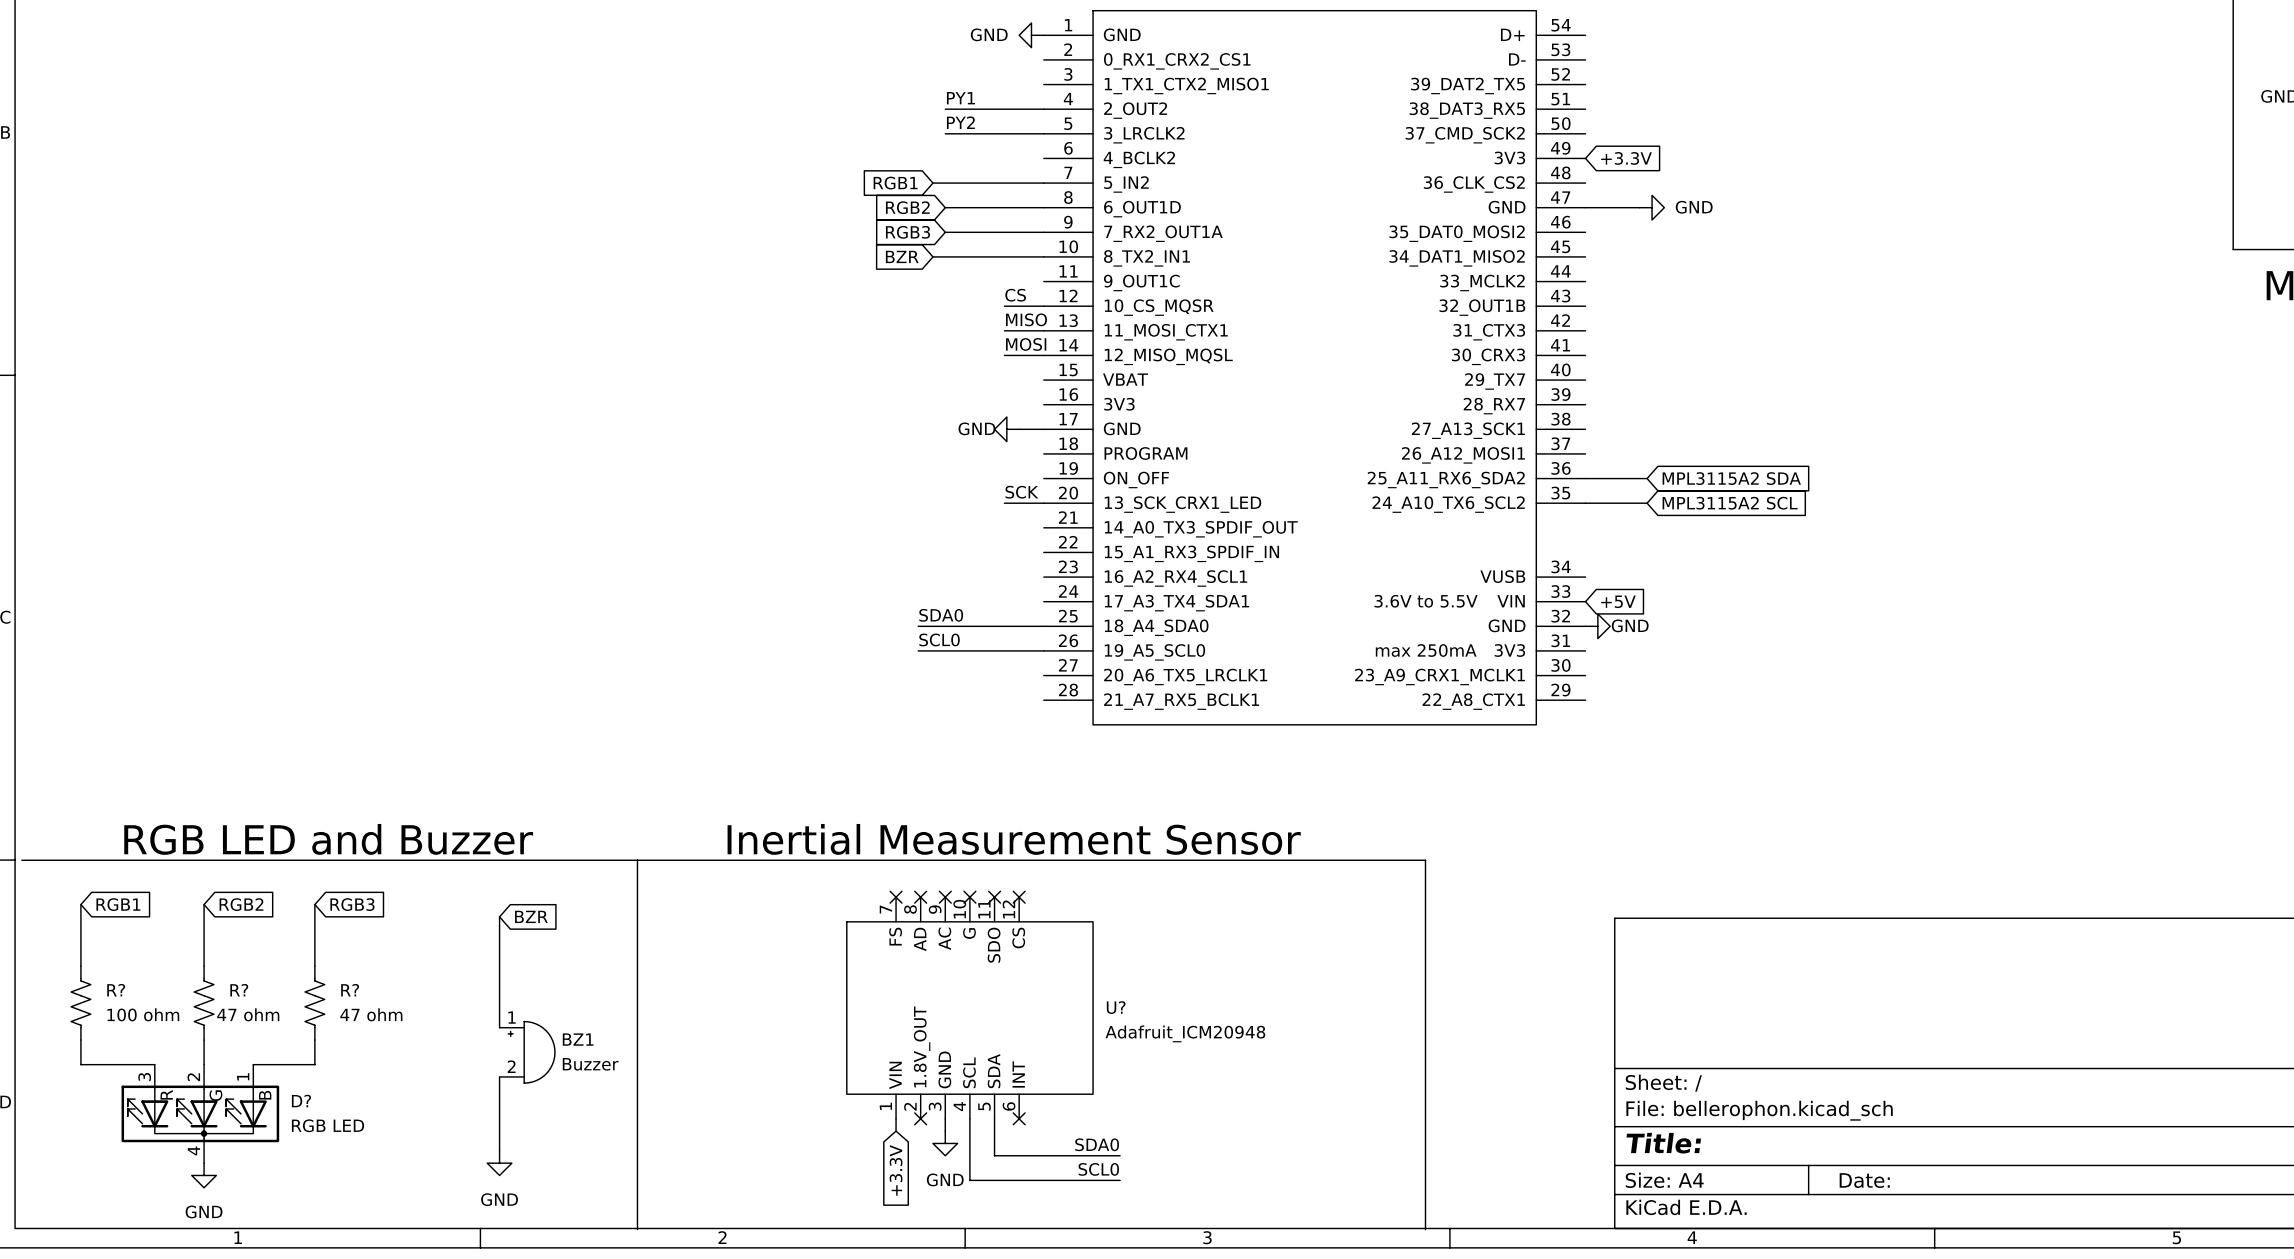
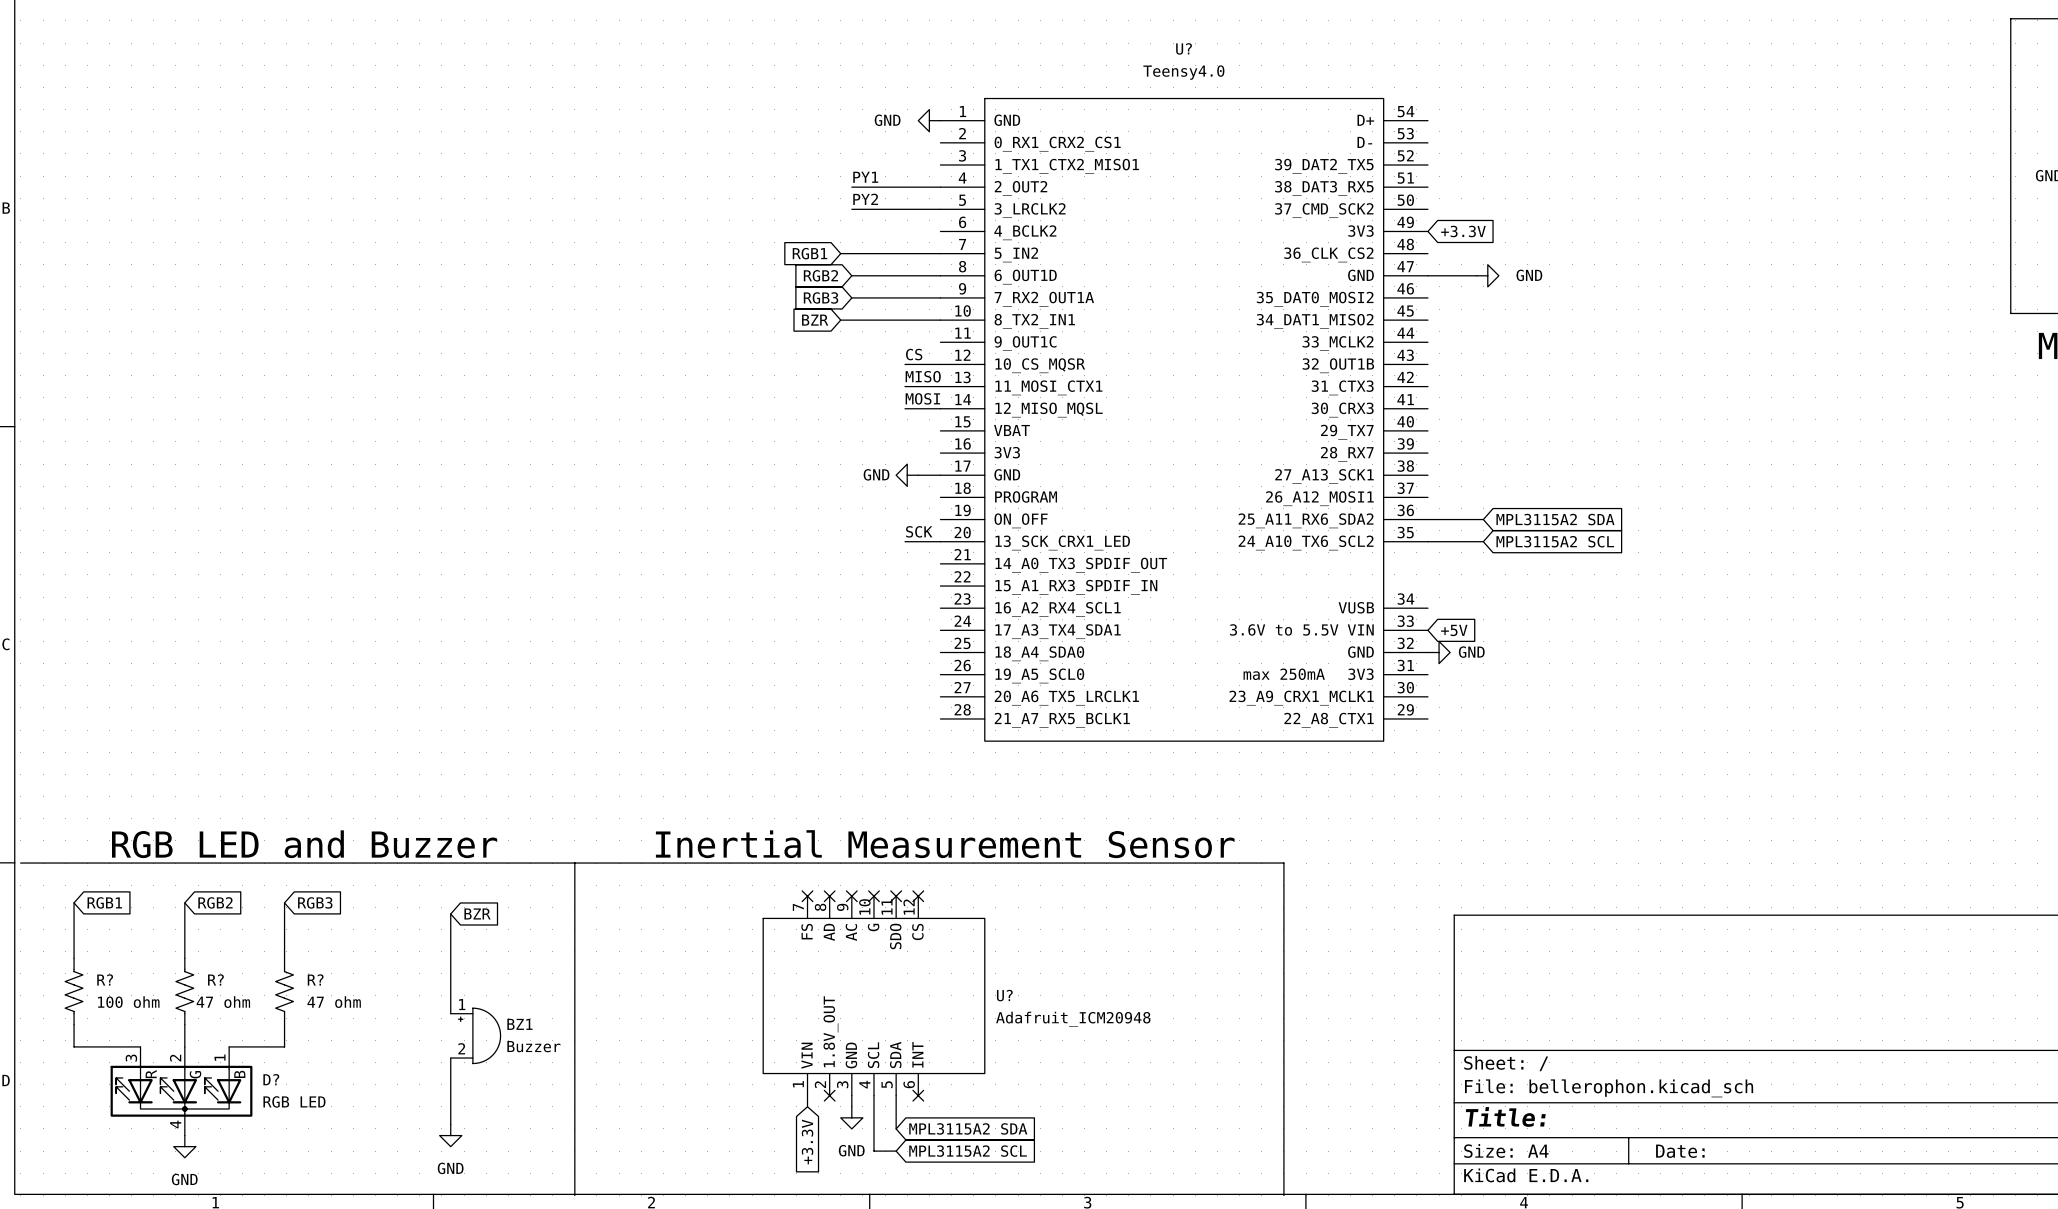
label: SDA0 (941, 615) -> none
wire: (918, 626) (1043, 626) -> none
label: SCL0 (939, 639) -> none
wire: (918, 650) (1043, 650) -> none
label: SDA0 (1097, 1144) -> none
wire: (994, 1155) (1120, 1155) -> none
global label: none -> MPL3115A2 SDA (968, 1128)
label: SCL0 (1098, 1169) -> none
wire: (994, 1180) (1120, 1180) -> none
global label: none -> MPL3115A2 SCL (968, 1151)

